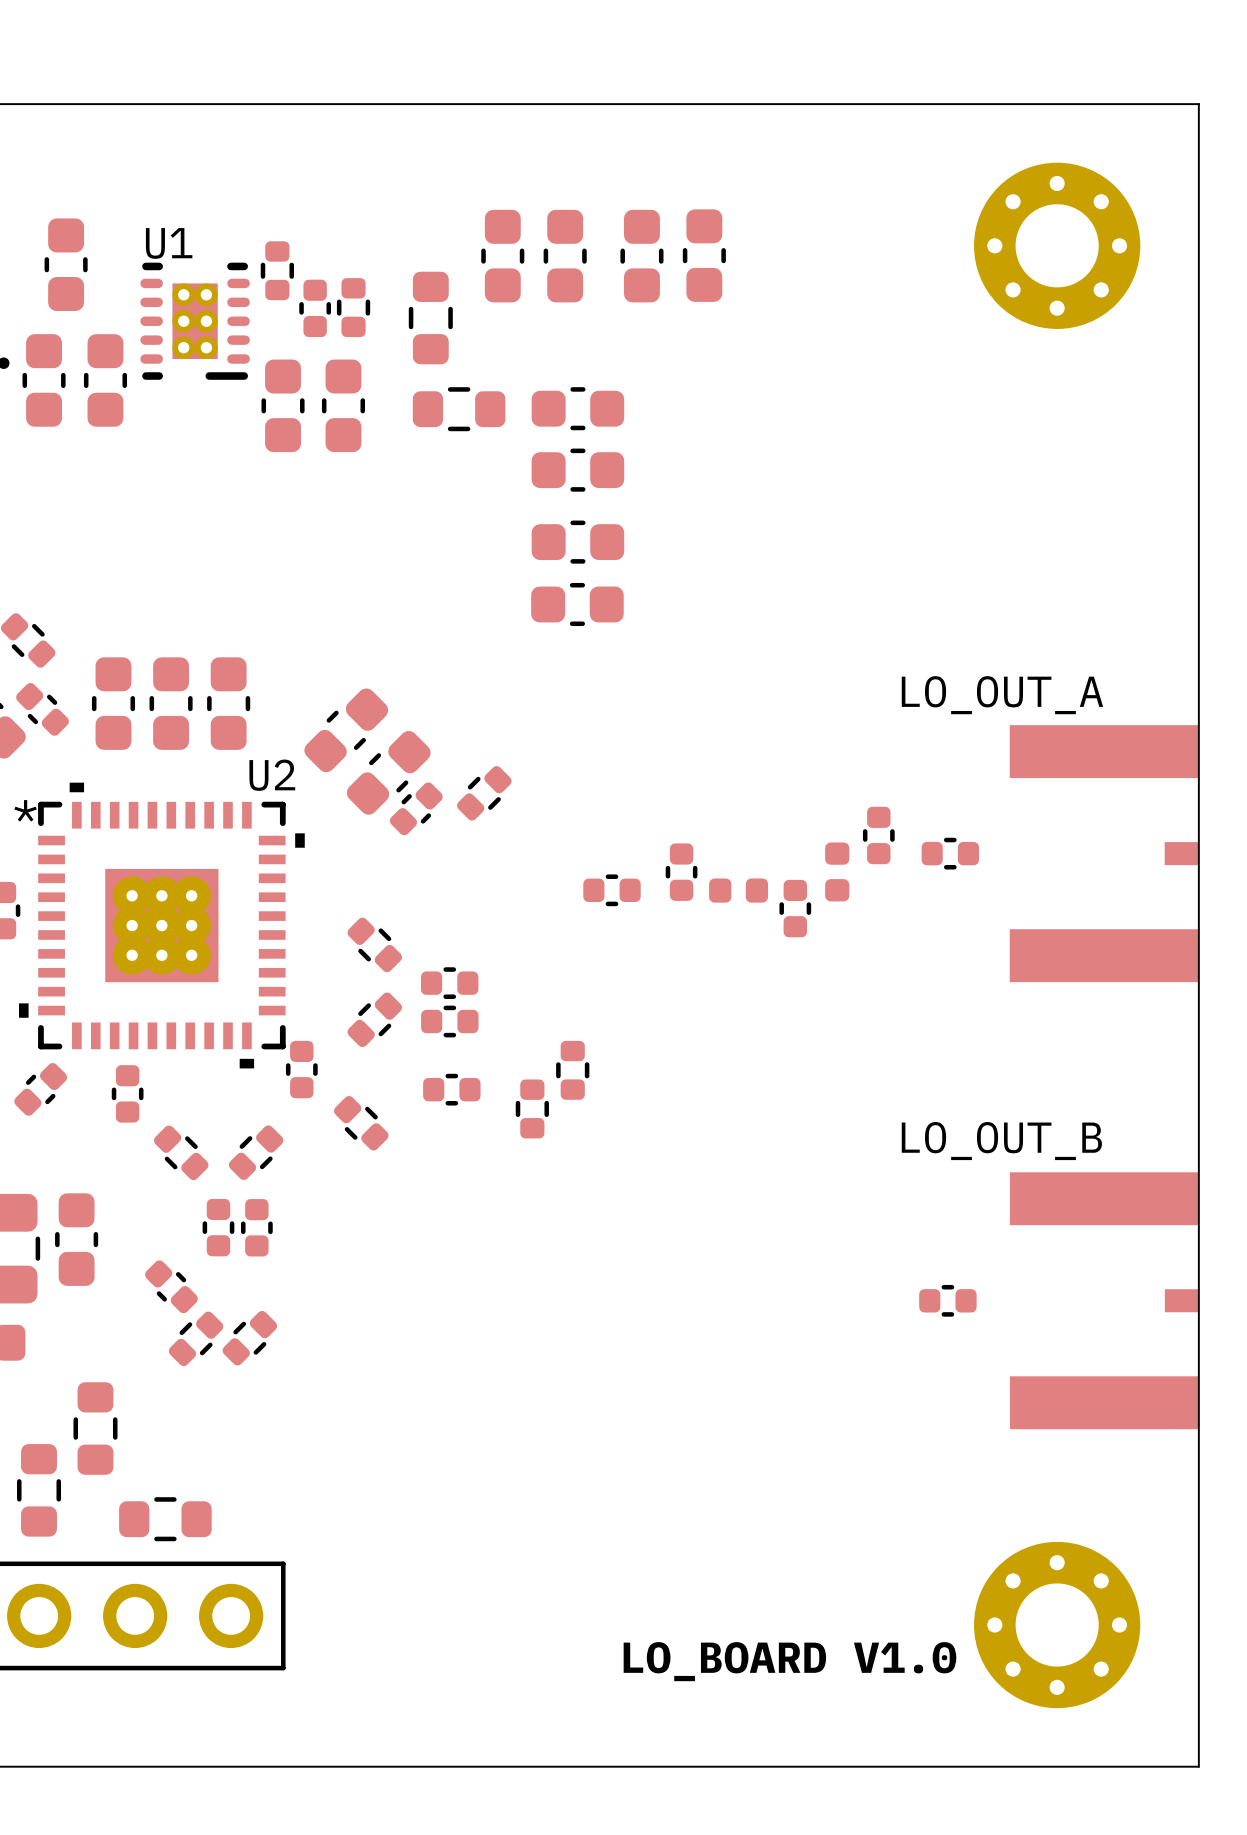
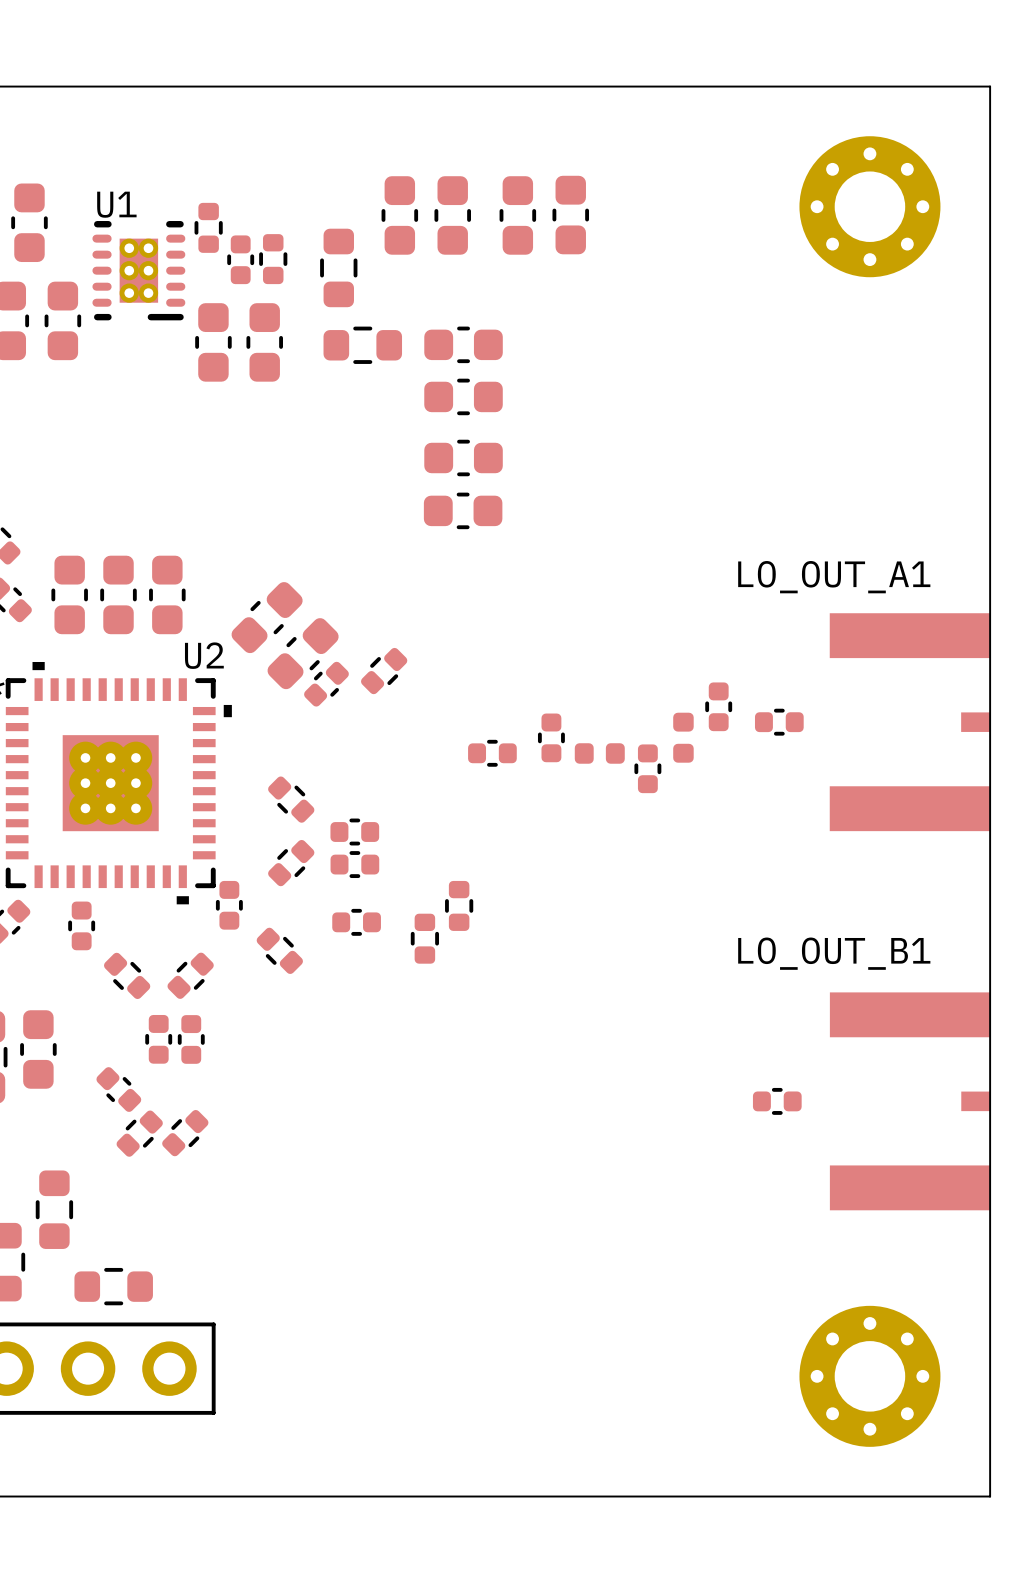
LO_OUT_A1 name: none -> LO_OUT_A1 (834, 577)
text: LO_OUT_A (1002, 695) -> none
LO_OUT_B1 name: none -> LO_OUT_B1 (834, 953)
text: LO_OUT_B (1001, 1141) -> none
text: LO_BOARD V1.0 (789, 1661) -> none

